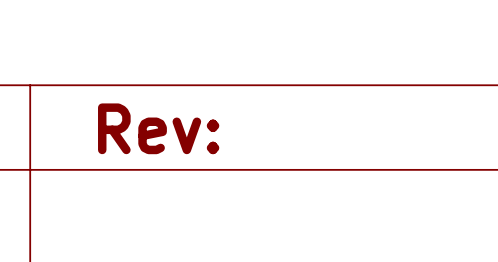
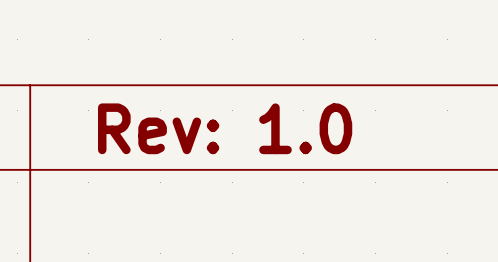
title block: Rev: (158, 128) -> Rev: 1.0 (225, 128)

